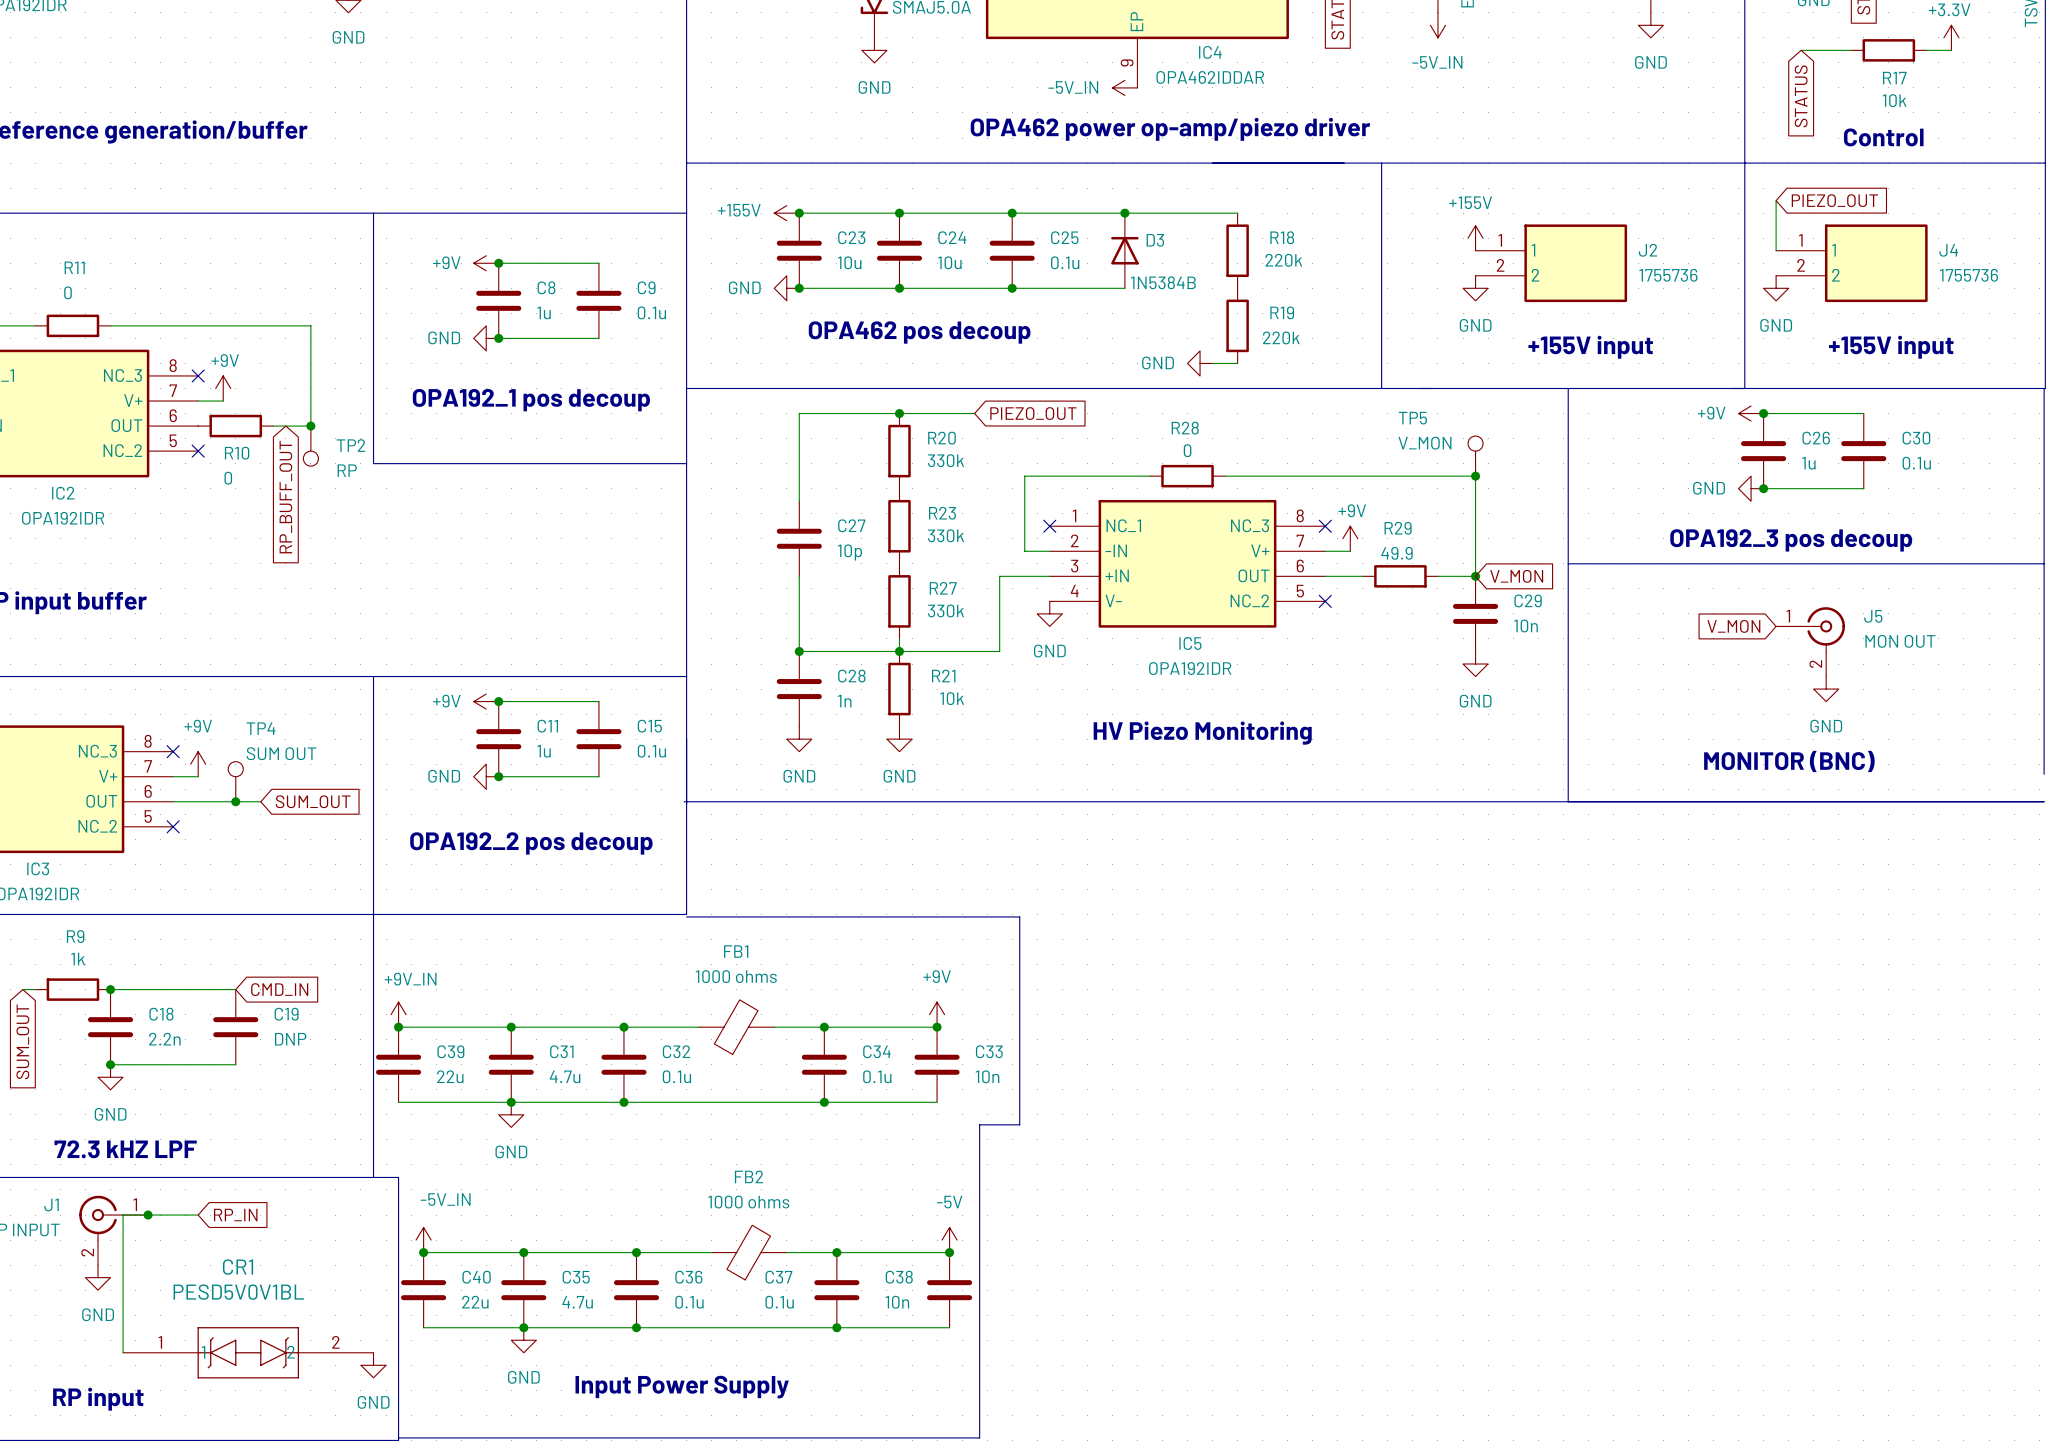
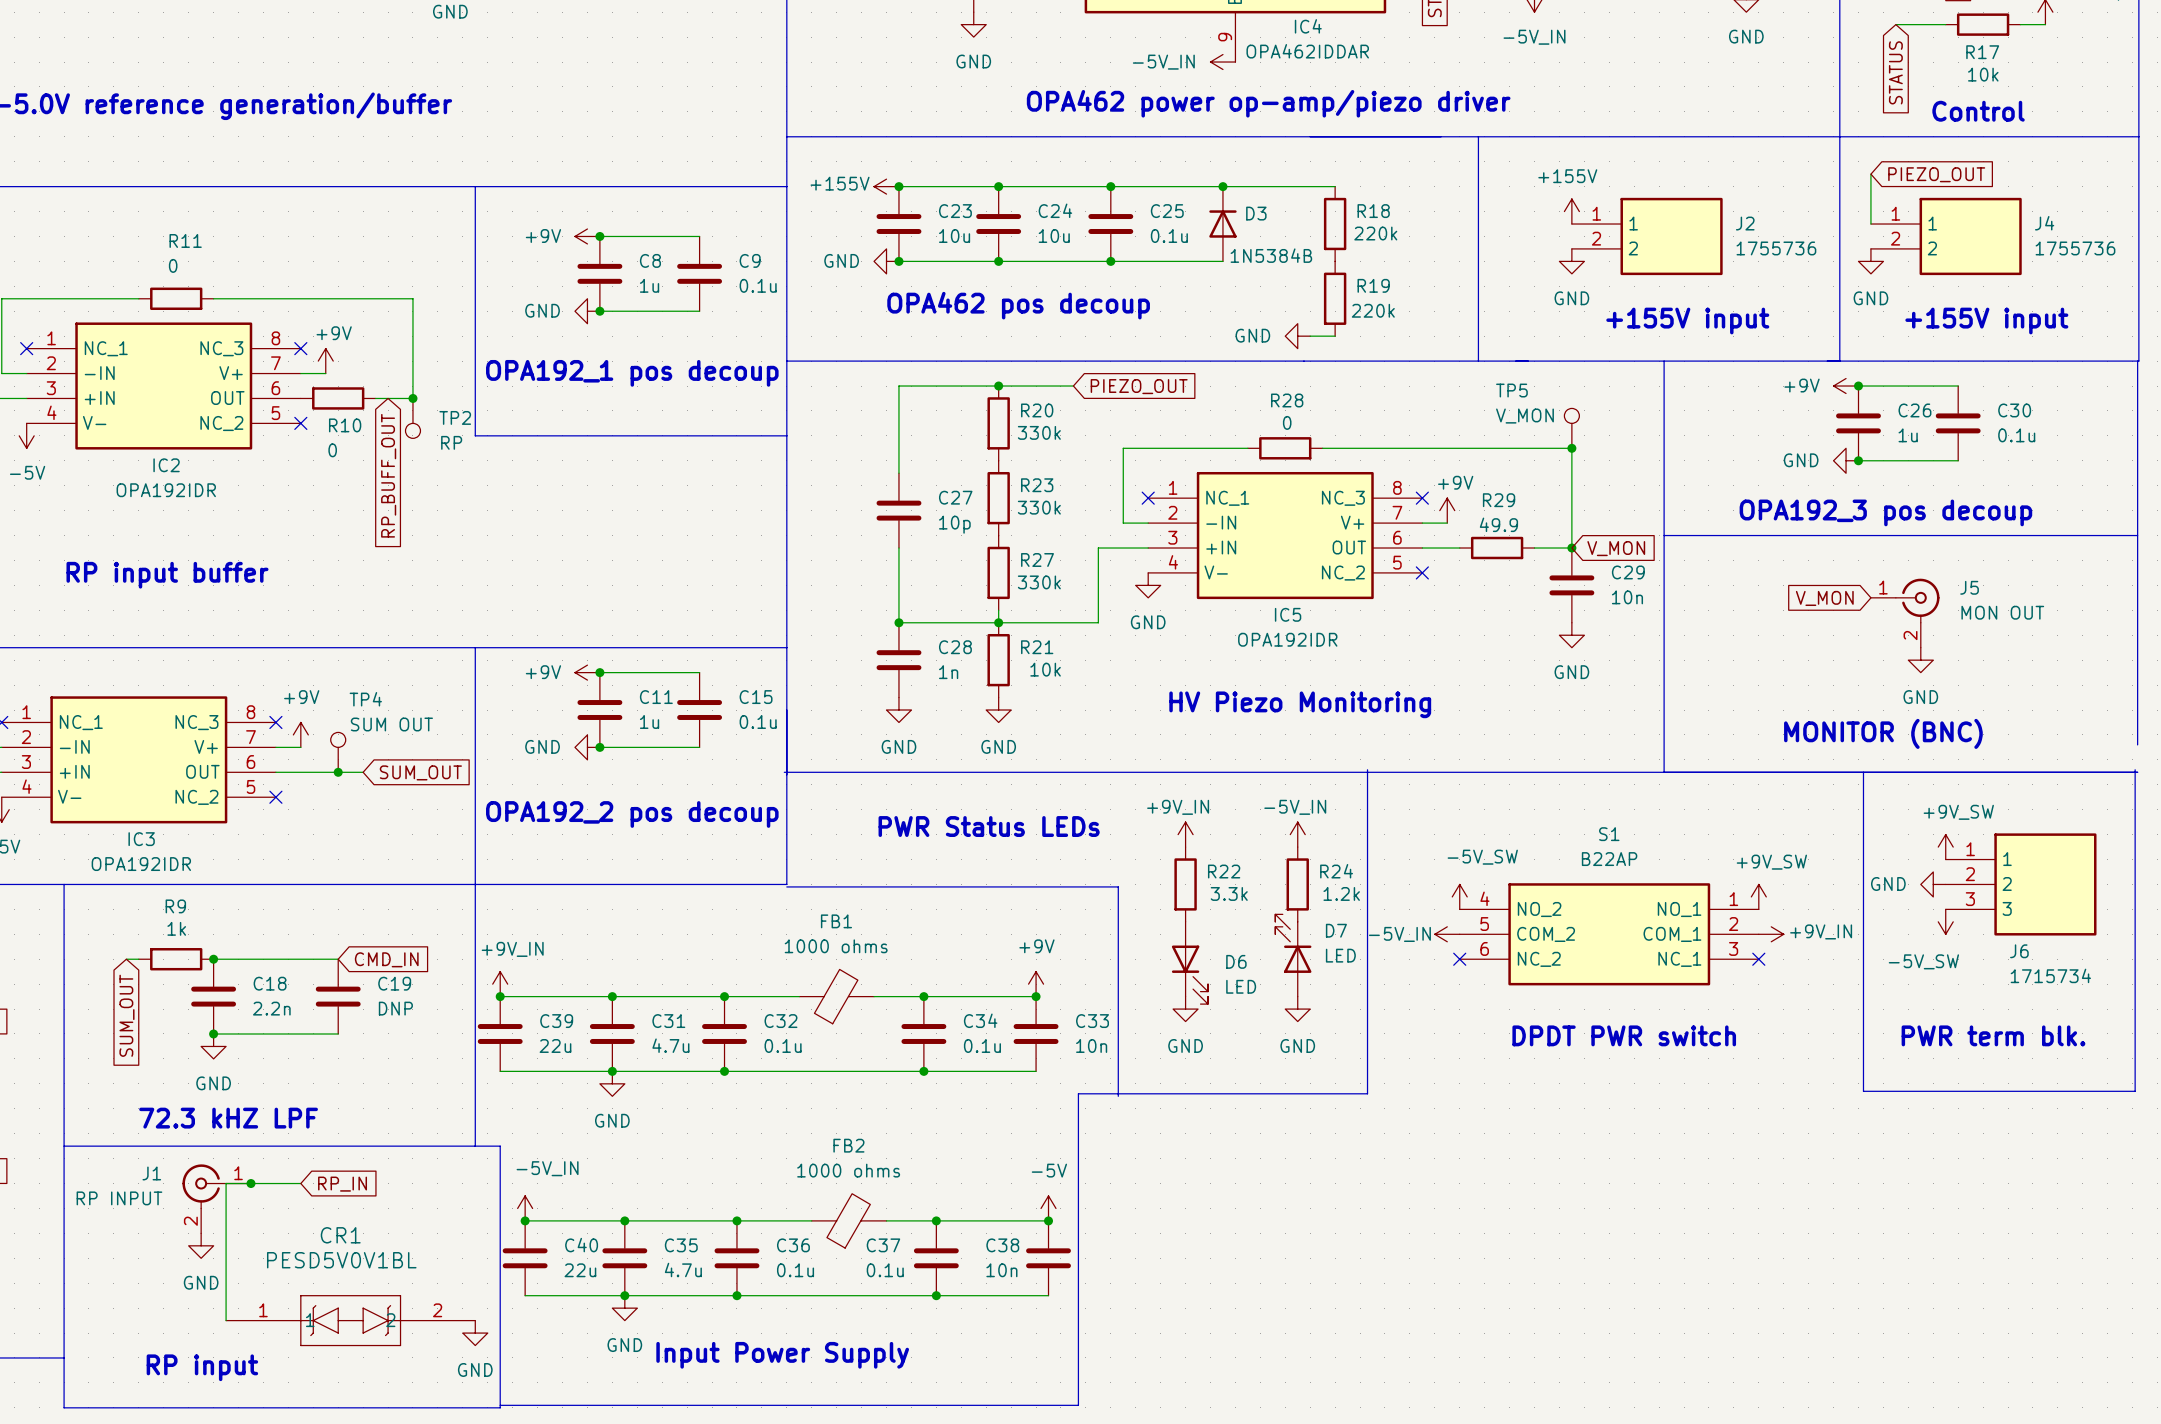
line: none -> (1367, 769) (1367, 1093) (1118, 1093) (1118, 1096)
line: none -> (2135, 769) (2135, 1091) (1863, 1091) (1863, 772)
text: none -> PWR Status LEDs (989, 826)
power symbol: none -> +9V_IN (1185, 834)
power symbol: none -> -5V_IN (1297, 834)
power symbol: none -> +9V_SW (1945, 847)
R22: none -> 3.3k (1185, 884)
R24: none -> 1.2k (1297, 884)
power symbol: none -> GND (1933, 884)
J6: none -> 1715734 (2021, 884)
power symbol: none -> -5V_SW (1459, 896)
power symbol: none -> +9V_SW (1758, 896)
power symbol: none -> -5V_SW (1945, 921)
power symbol: none -> -5V_IN (1447, 934)
S1: none -> B22AP (1609, 934)
power symbol: none -> +9V_IN (1771, 934)
D7: none -> LED (1293, 955)
no-connect mark: none -> (1459, 959)
no-connect mark: none -> (1758, 959)
D6: none -> LED (1189, 962)
power symbol: none -> GND (1185, 1009)
power symbol: none -> GND (1297, 1009)
text: none -> DPDT PWR switch (1624, 1035)
text: none -> PWR term blk. (1993, 1035)

